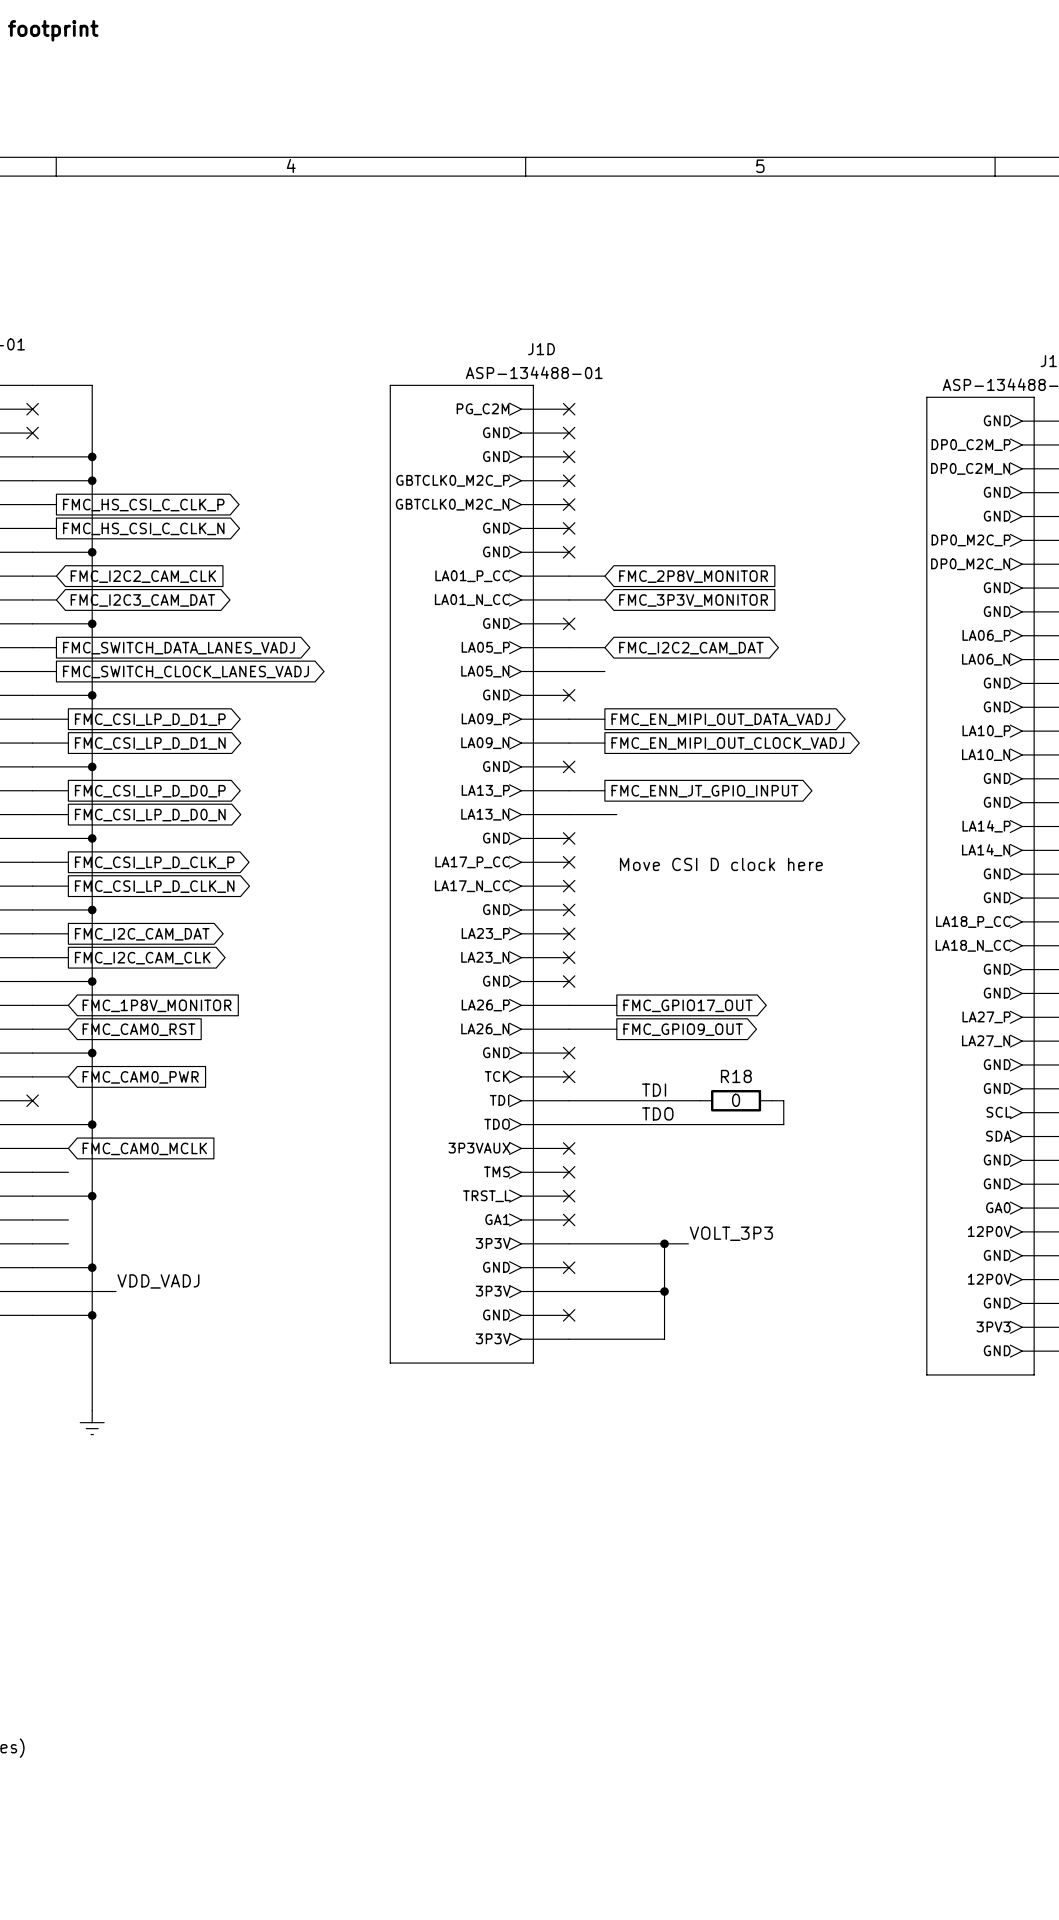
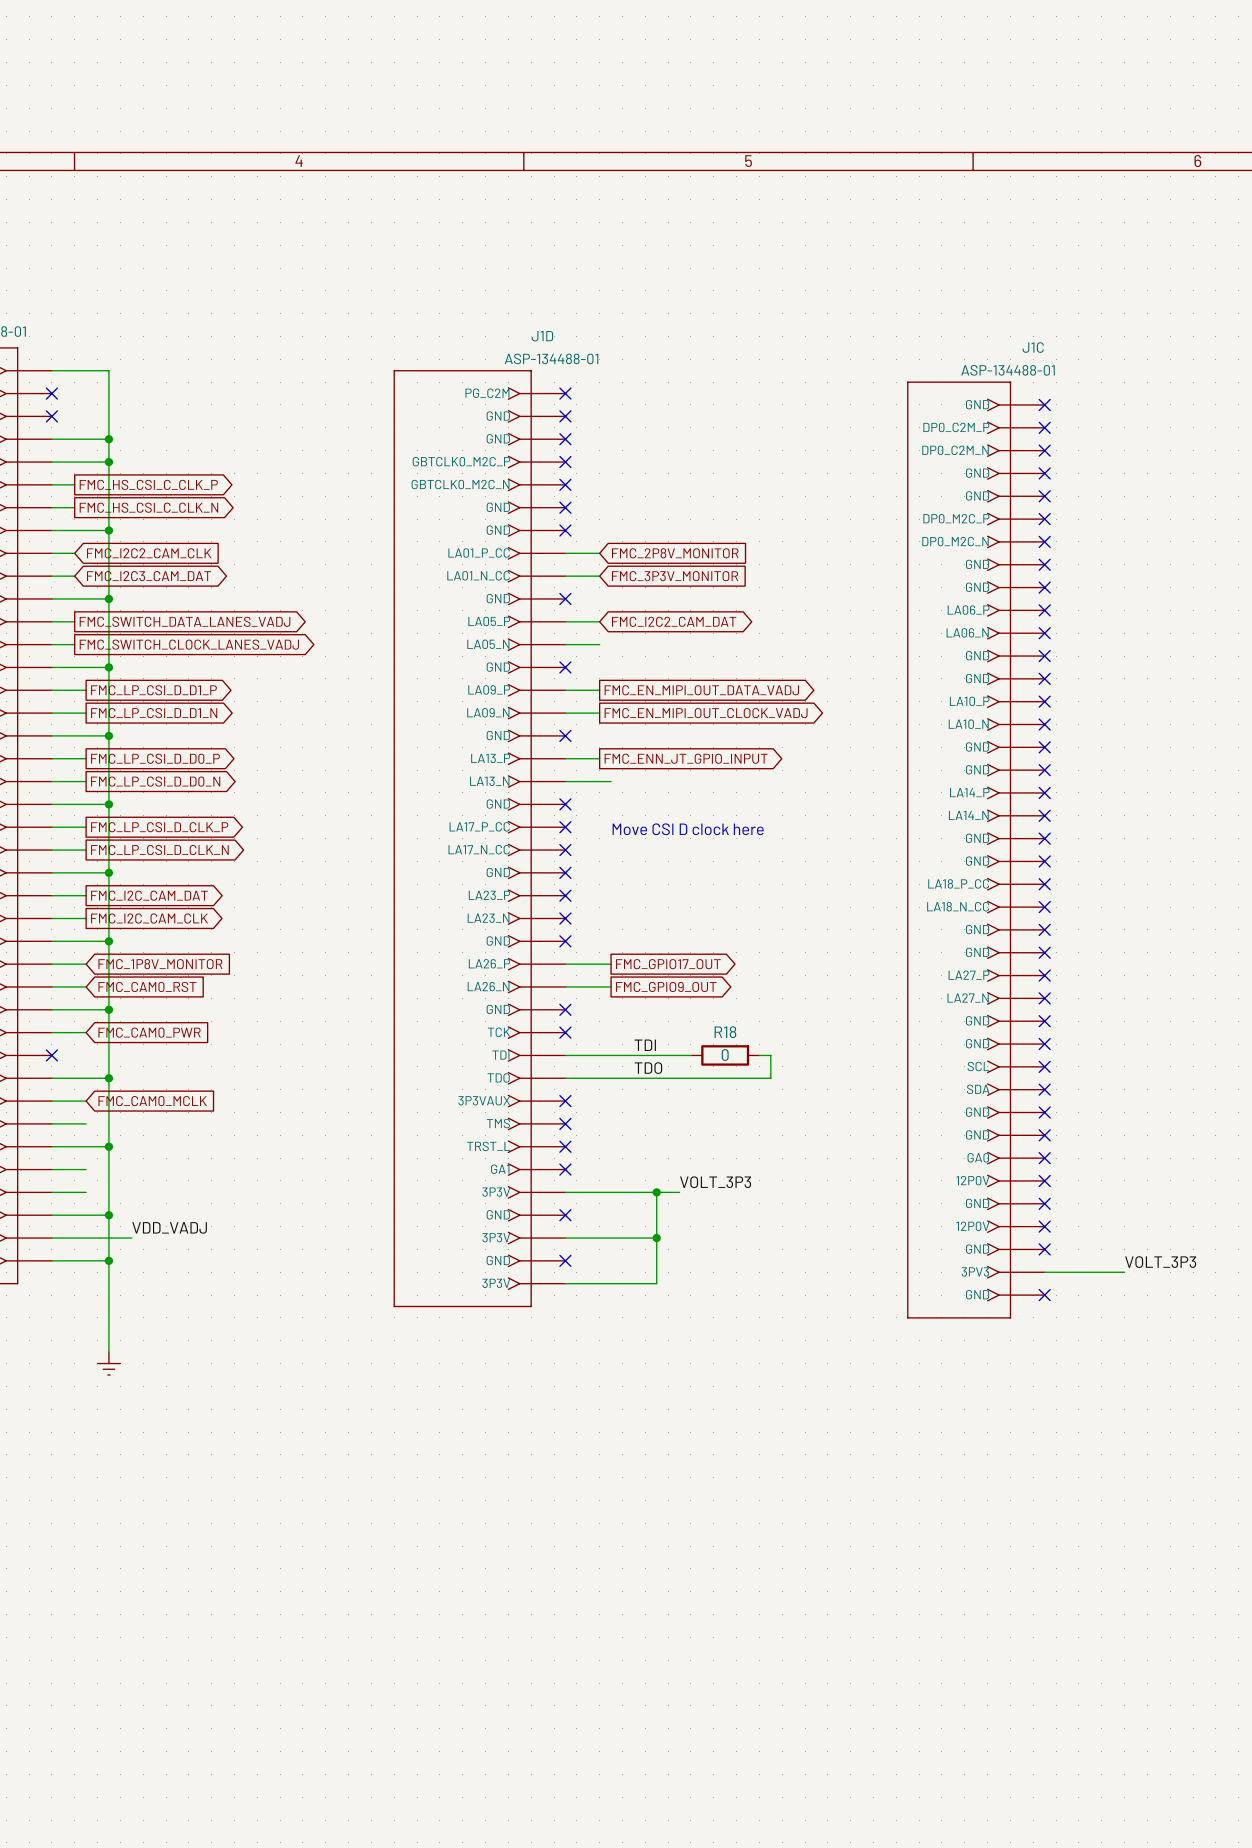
global label: FMC_CSI_LP_D_D1_P (150, 719) -> FMC_LP_CSI_D_D1_P (153, 690)
global label: FMC_CSI_LP_D_D1_N (150, 743) -> FMC_LP_CSI_D_D1_N (154, 713)
global label: FMC_CSI_LP_D_D0_P (150, 791) -> FMC_LP_CSI_D_D0_P (155, 758)
global label: FMC_CSI_LP_D_D0_N (150, 815) -> FMC_LP_CSI_D_D0_N (155, 781)
global label: FMC_CSI_LP_D_CLK_P (154, 862) -> FMC_LP_CSI_D_CLK_P (159, 827)
global label: FMC_CSI_LP_D_CLK_N (154, 886) -> FMC_LP_CSI_D_CLK_N (159, 850)

